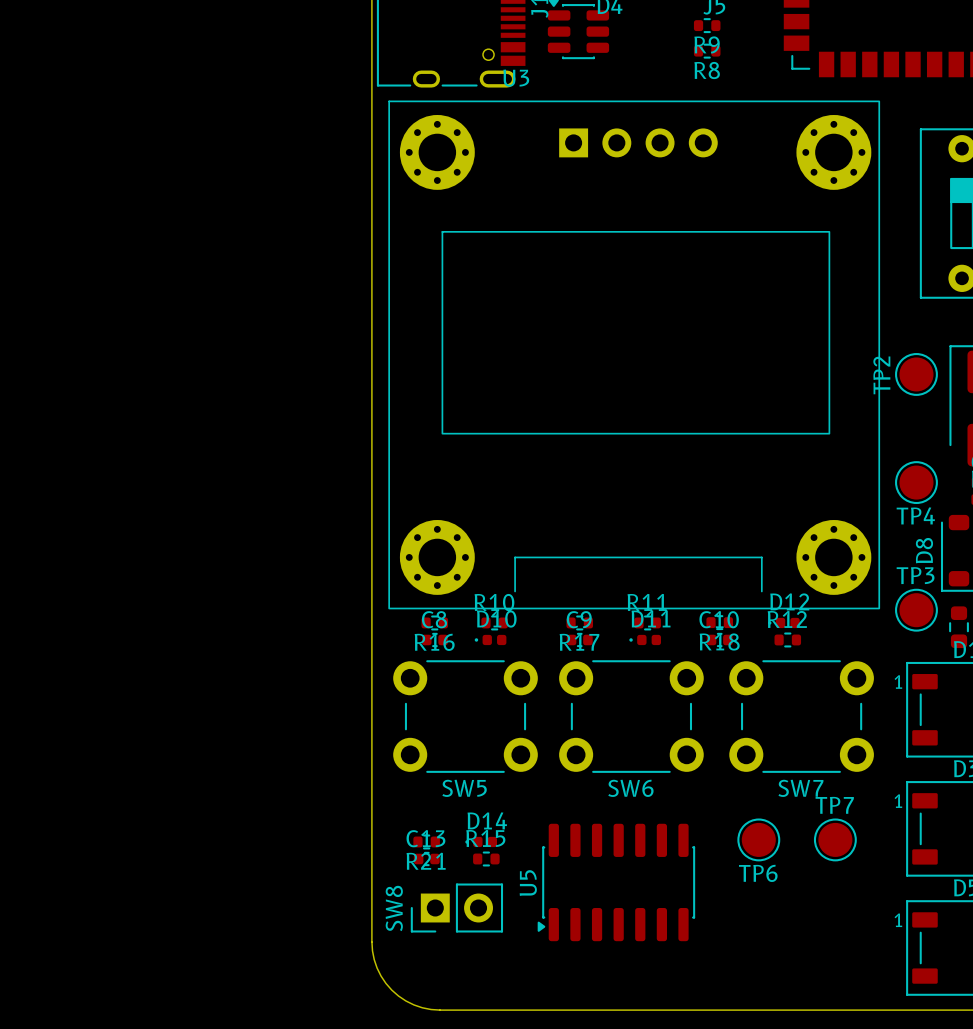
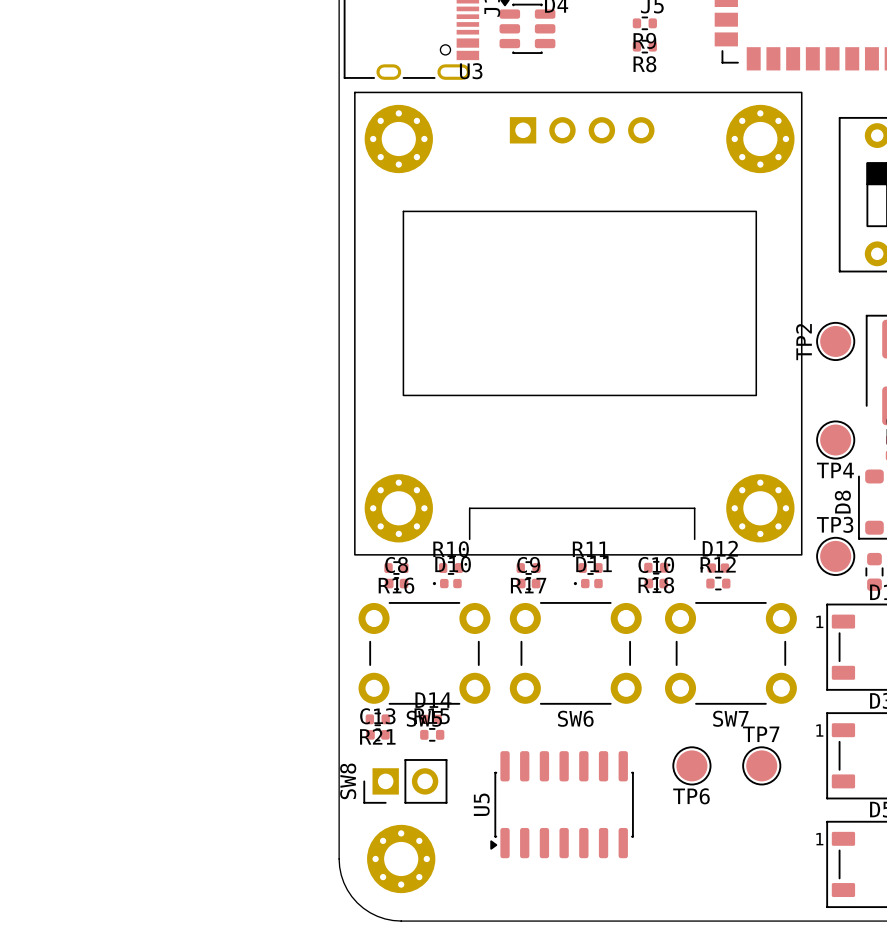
R21 position: (426, 841) -> (377, 719)
D14 position: (481, 841) -> (427, 719)
C13 position: (426, 858) -> (377, 734)
R15 position: (486, 858) -> (432, 734)
SW8 position: (456, 908) -> (405, 781)
part: none -> (401, 858)

